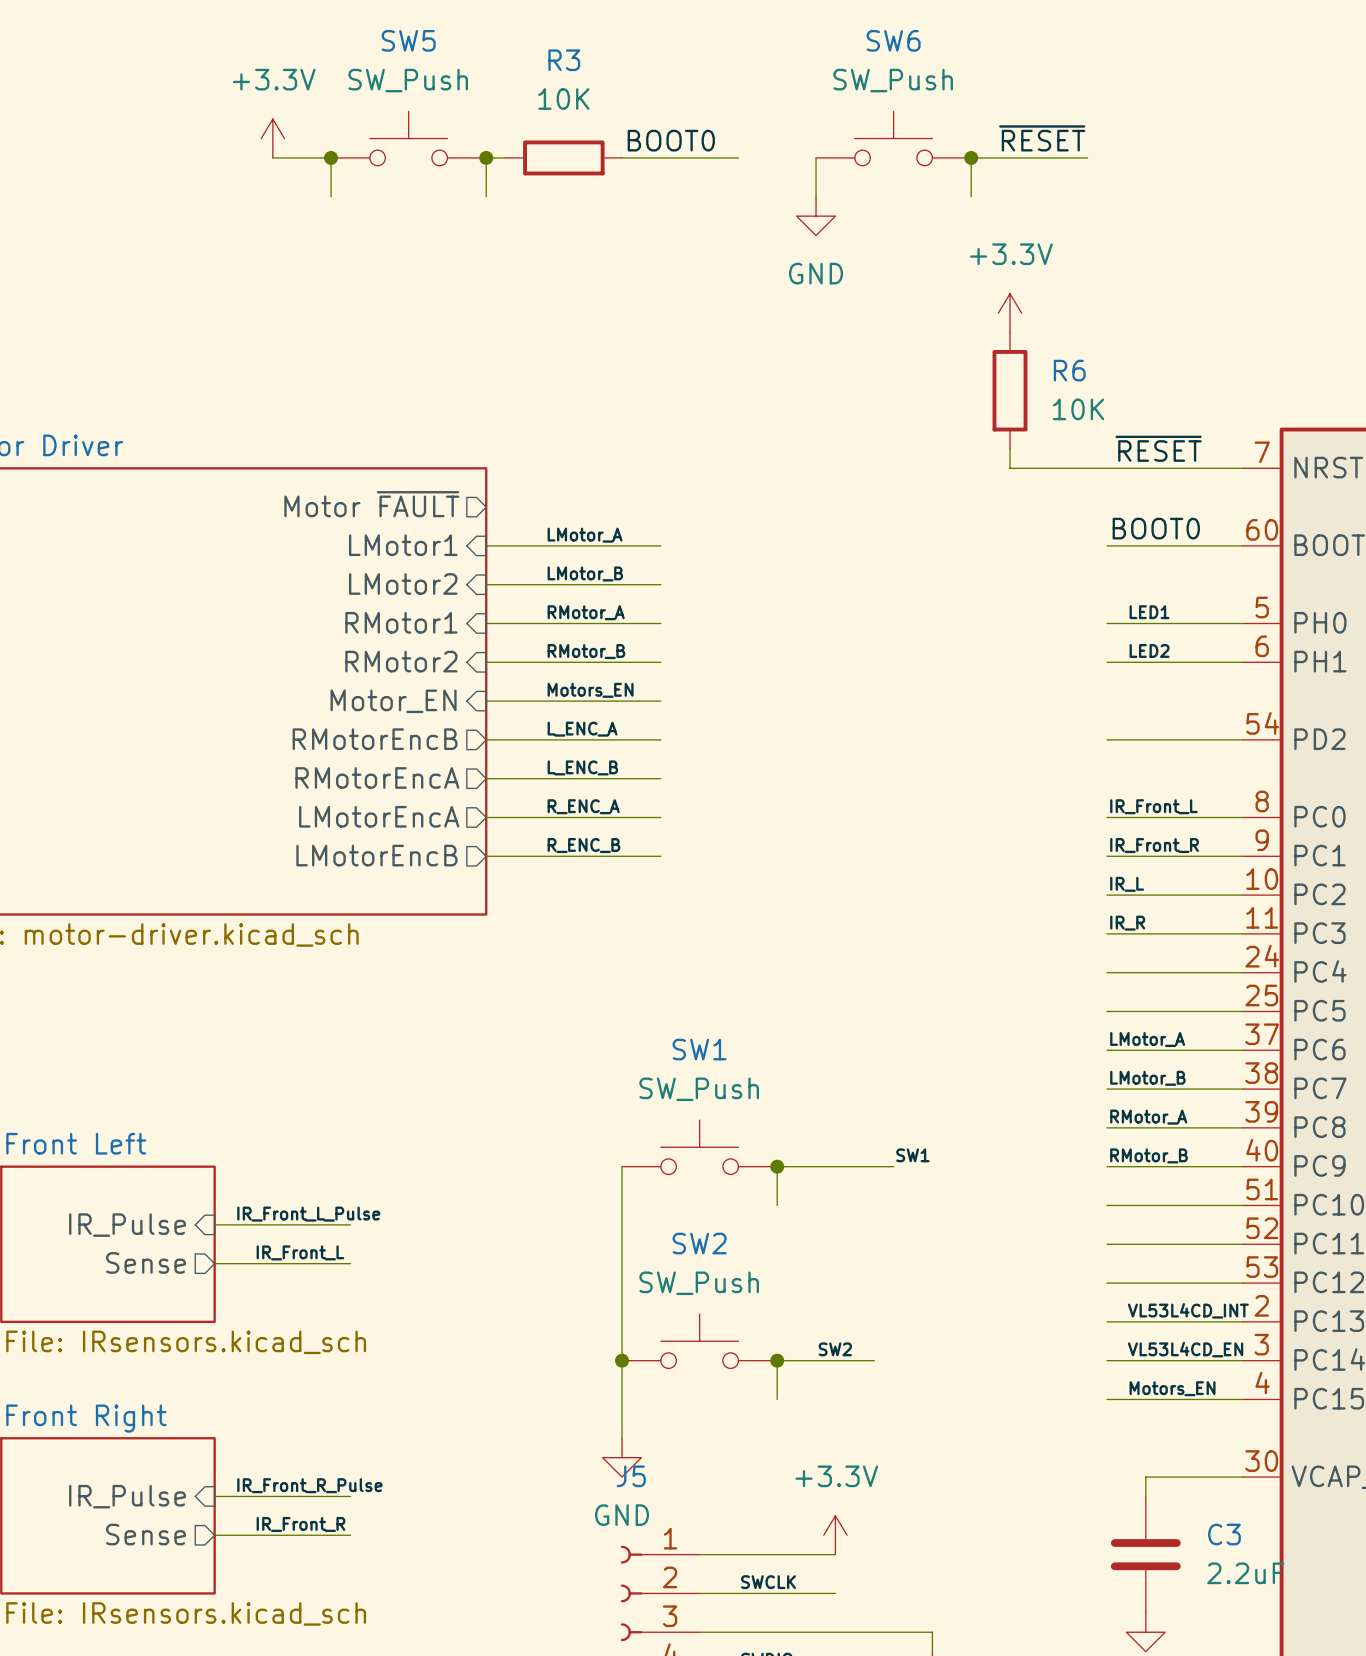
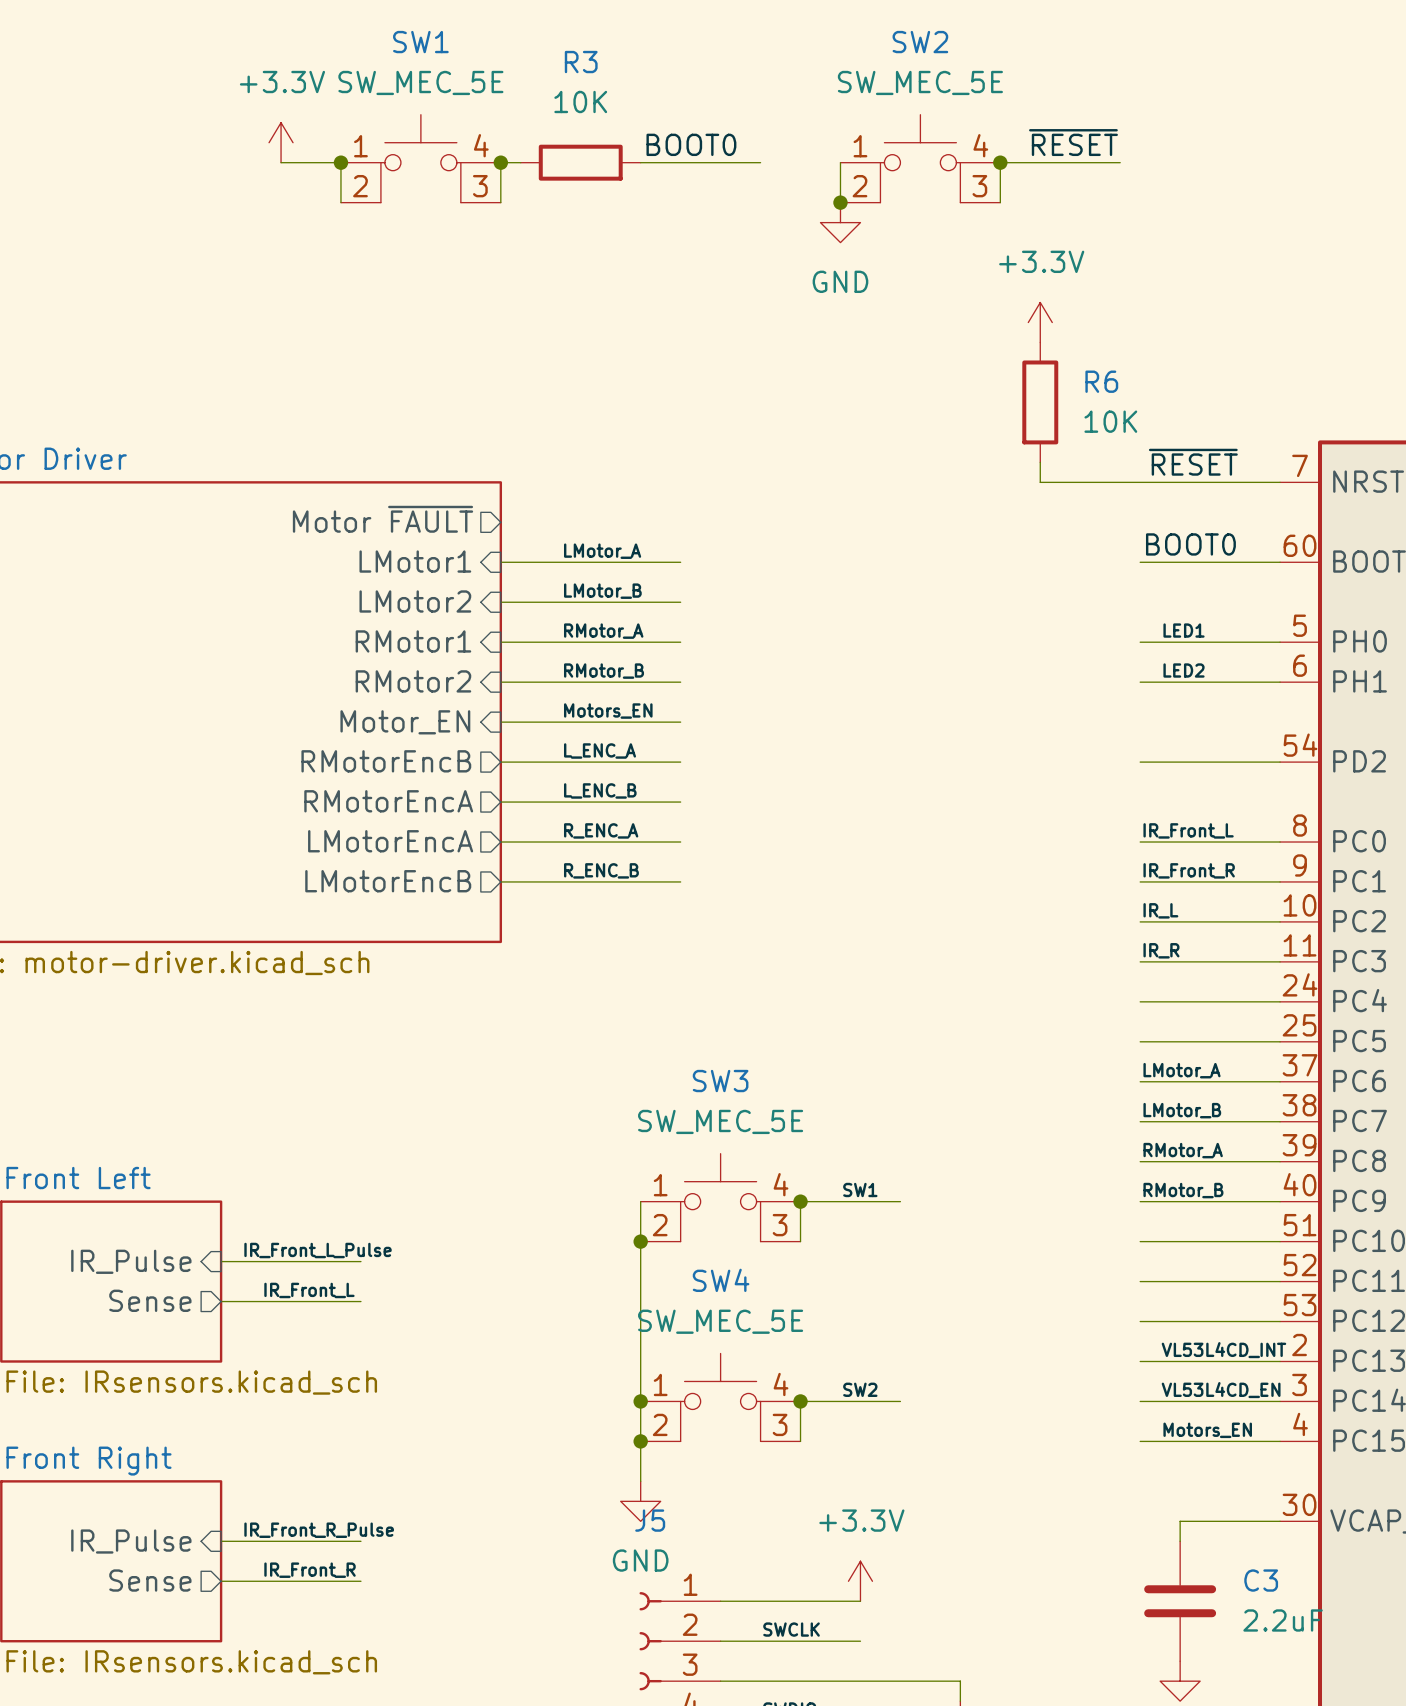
SW5: SW_Push (408, 138) -> none
SW6: SW_Push (893, 138) -> none
junction: none -> (840, 202)
SW1 value: SW_Push (699, 1089) -> SW_MEC_5E (420, 82)
SW1 symbol: [622, 1120, 778, 1175] -> [340, 114, 501, 203]
label position: SW1 (912, 1155) -> SW1 (860, 1189)
SW3: none -> SW_MEC_5E (720, 1197)
wire: (874, 1166) (893, 1166) -> none
junction: none -> (640, 1241)
SW2 value: SW_Push (699, 1283) -> SW_MEC_5E (920, 82)
SW2 symbol: [622, 1314, 778, 1369] -> [840, 114, 1001, 203]
SW4: none -> SW_MEC_5E (720, 1397)
junction: none -> (640, 1441)

